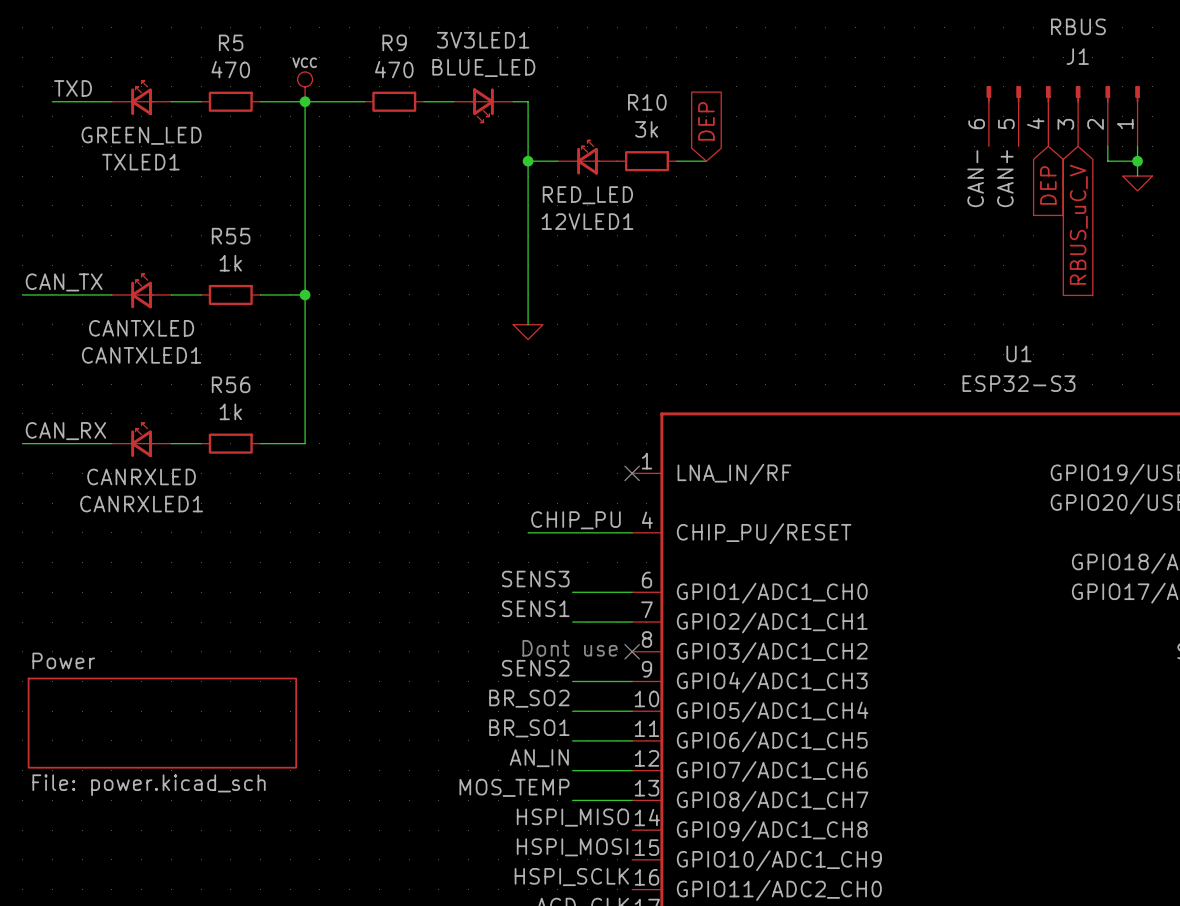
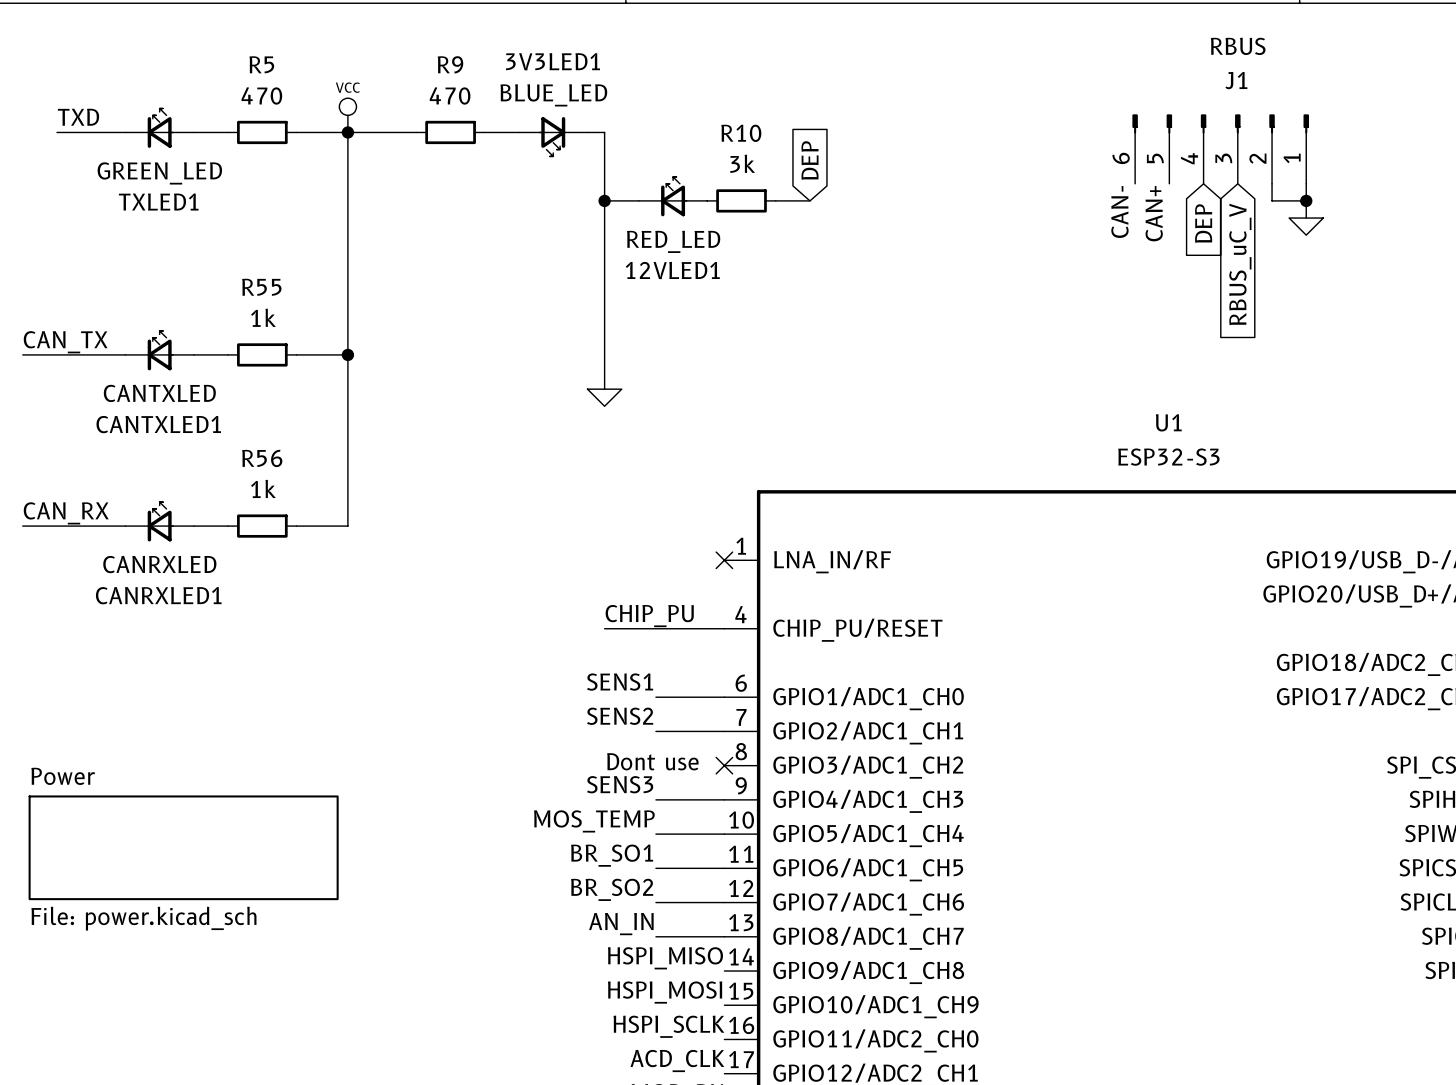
label: SENS3 (535, 579) -> SENS1 (620, 682)
label: SENS1 (535, 608) -> SENS2 (620, 716)
label: SENS2 (535, 668) -> SENS3 (620, 784)
label: BR_SO2 (529, 698) -> MOS_TEMP (594, 821)
label: AN_IN (539, 758) -> BR_SO2 (612, 889)
label: MOS_TEMP (514, 787) -> AN_IN (621, 924)

